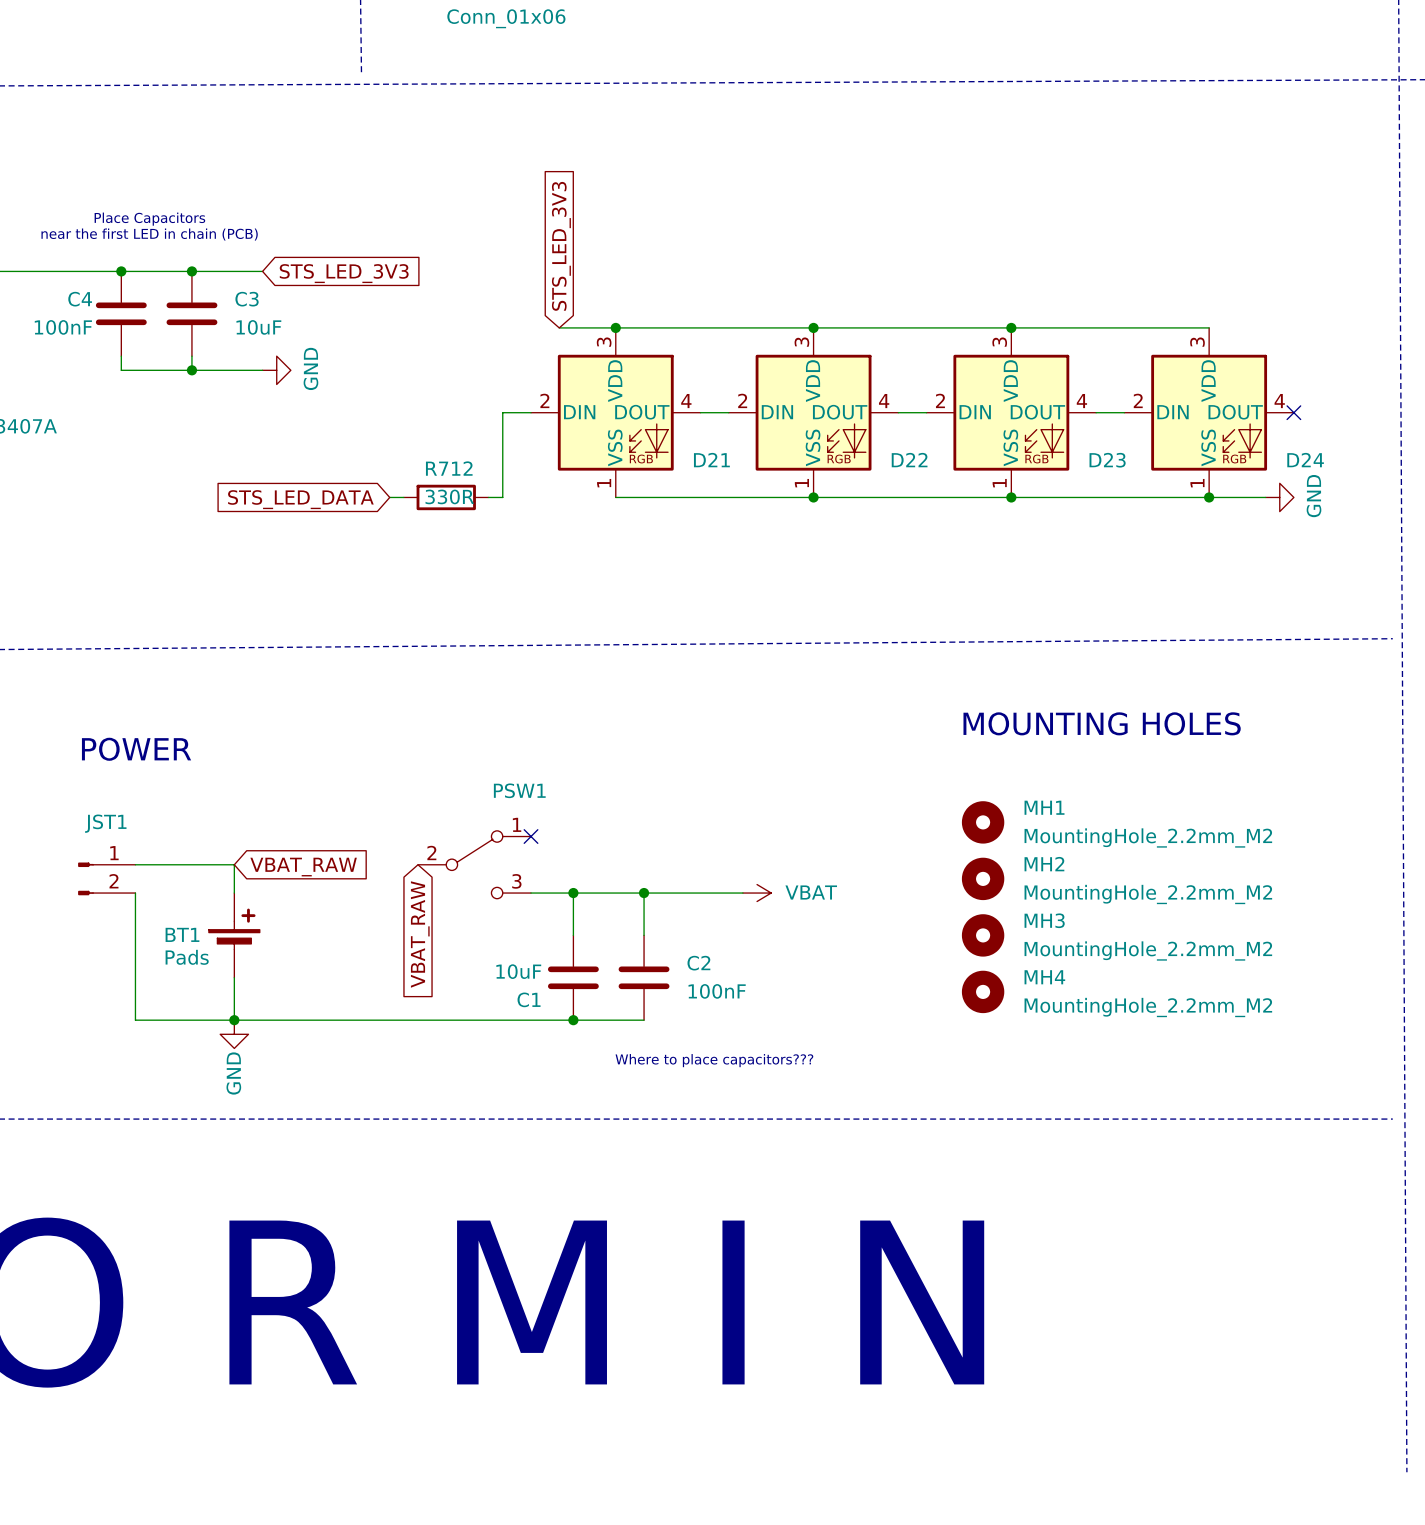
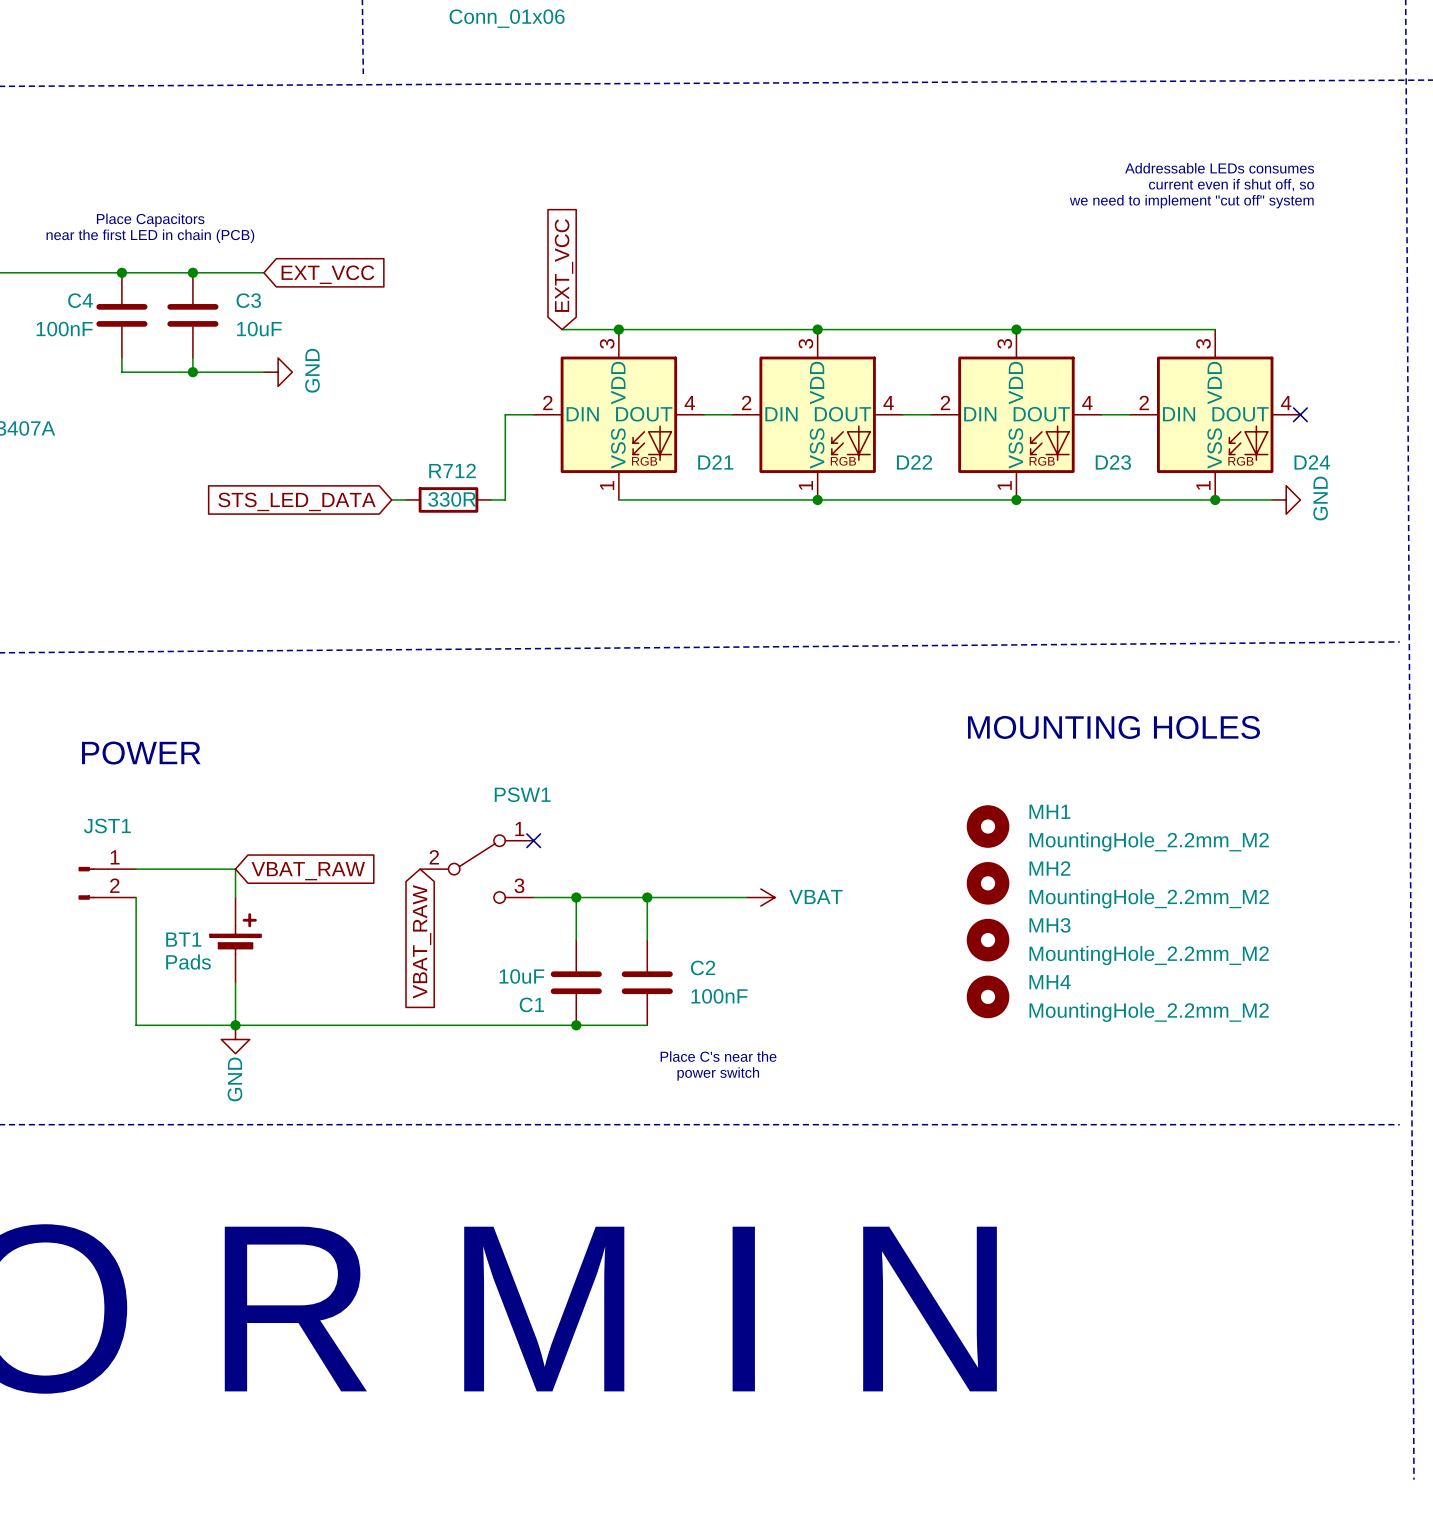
text: none -> Addressable LEDs consumes (1219, 168)
text: none -> current even if shut off, so (1231, 185)
text: none -> we need to implement "cut off" system (1191, 201)
global label: STS_LED_3V3 (561, 246) -> EXT_VCC (564, 265)
global label: STS_LED_3V3 (344, 273) -> EXT_VCC (327, 274)
text: none -> Place C's near the (718, 1056)
text: Where to place capacitors??? (714, 1060) -> none
text: none -> power switch (718, 1073)

